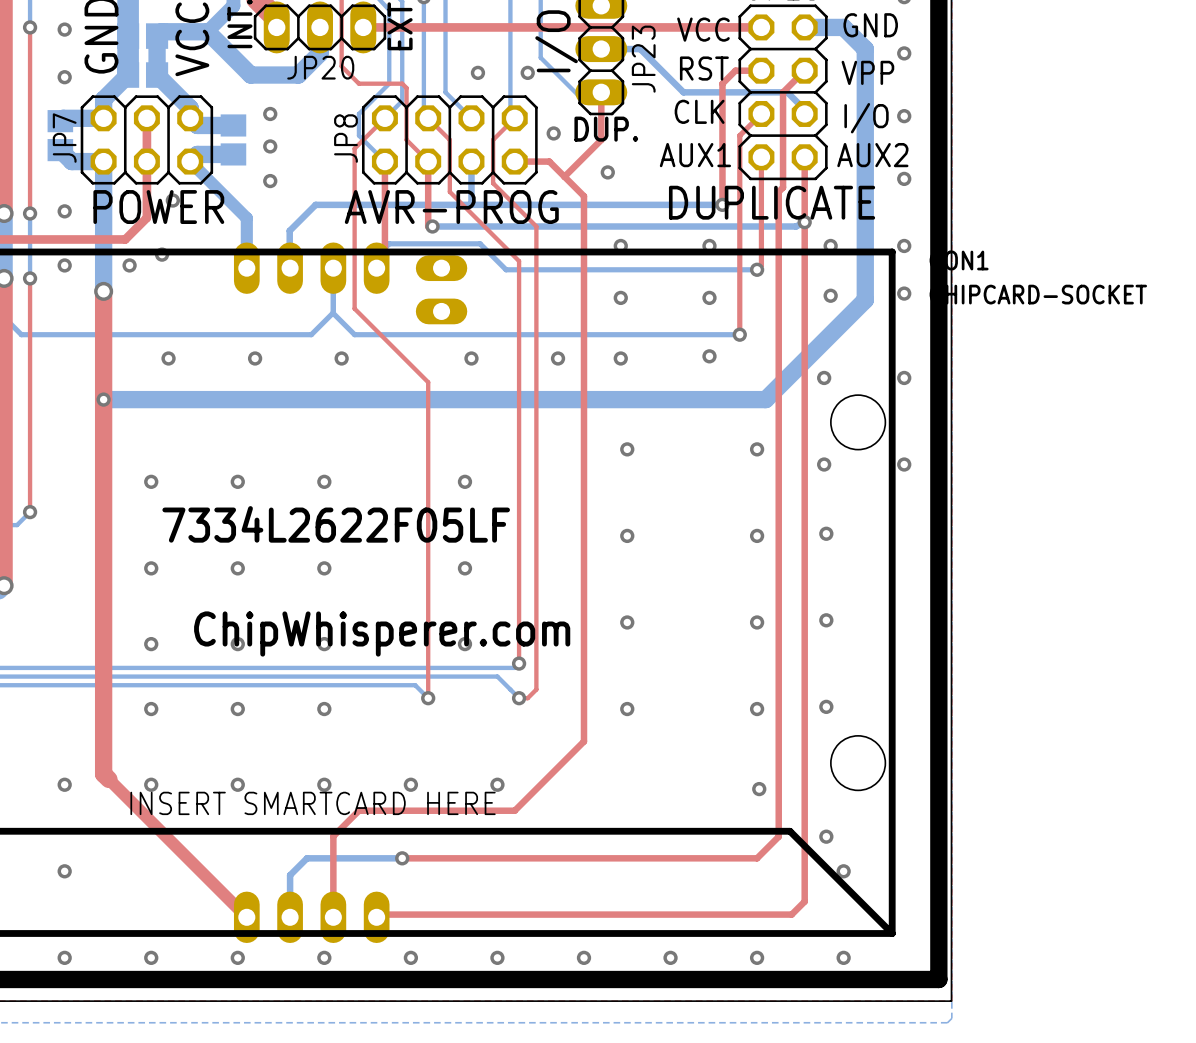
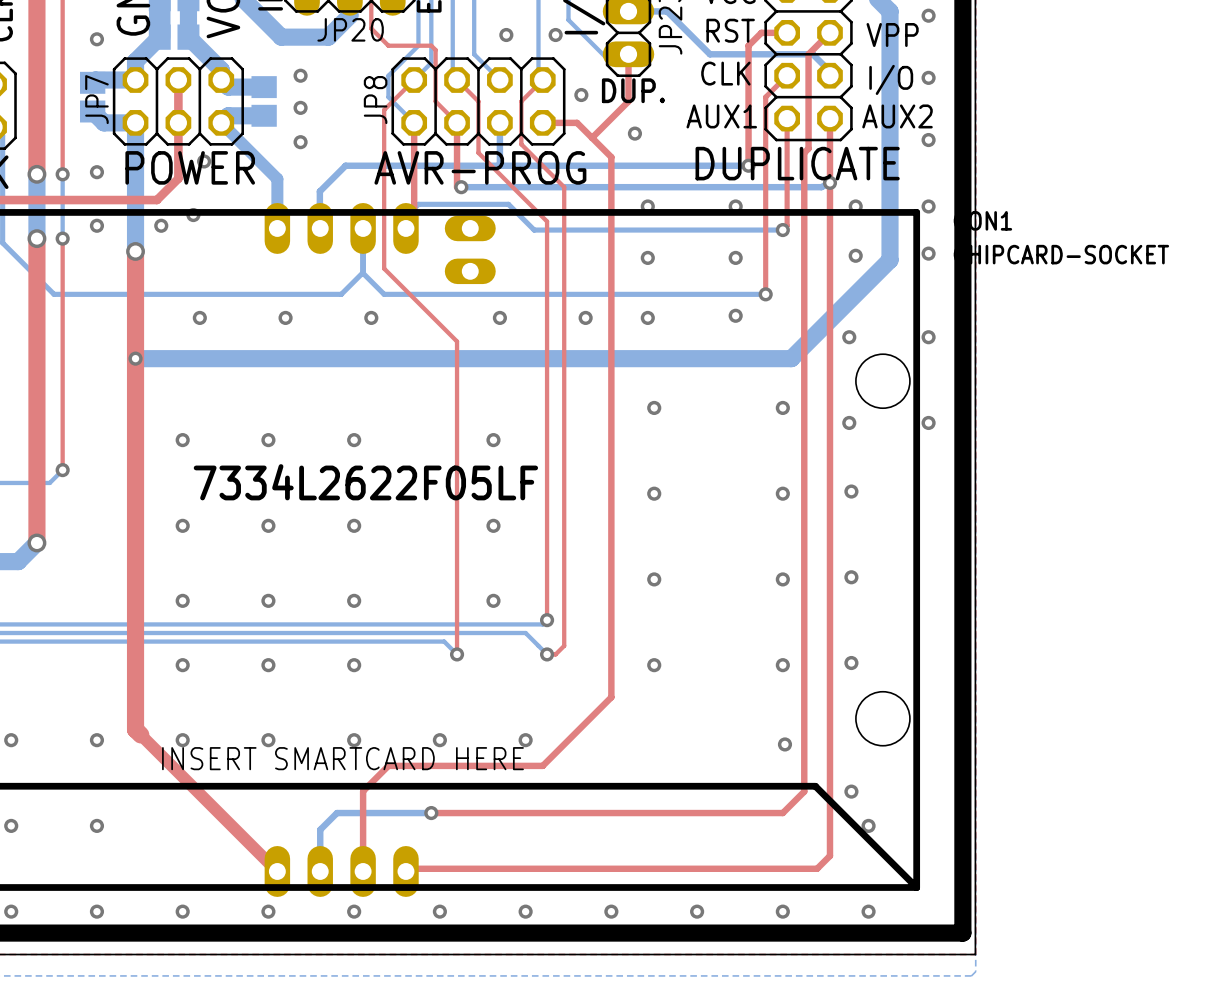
text: ChipWhisperer.com (382, 634) -> none

